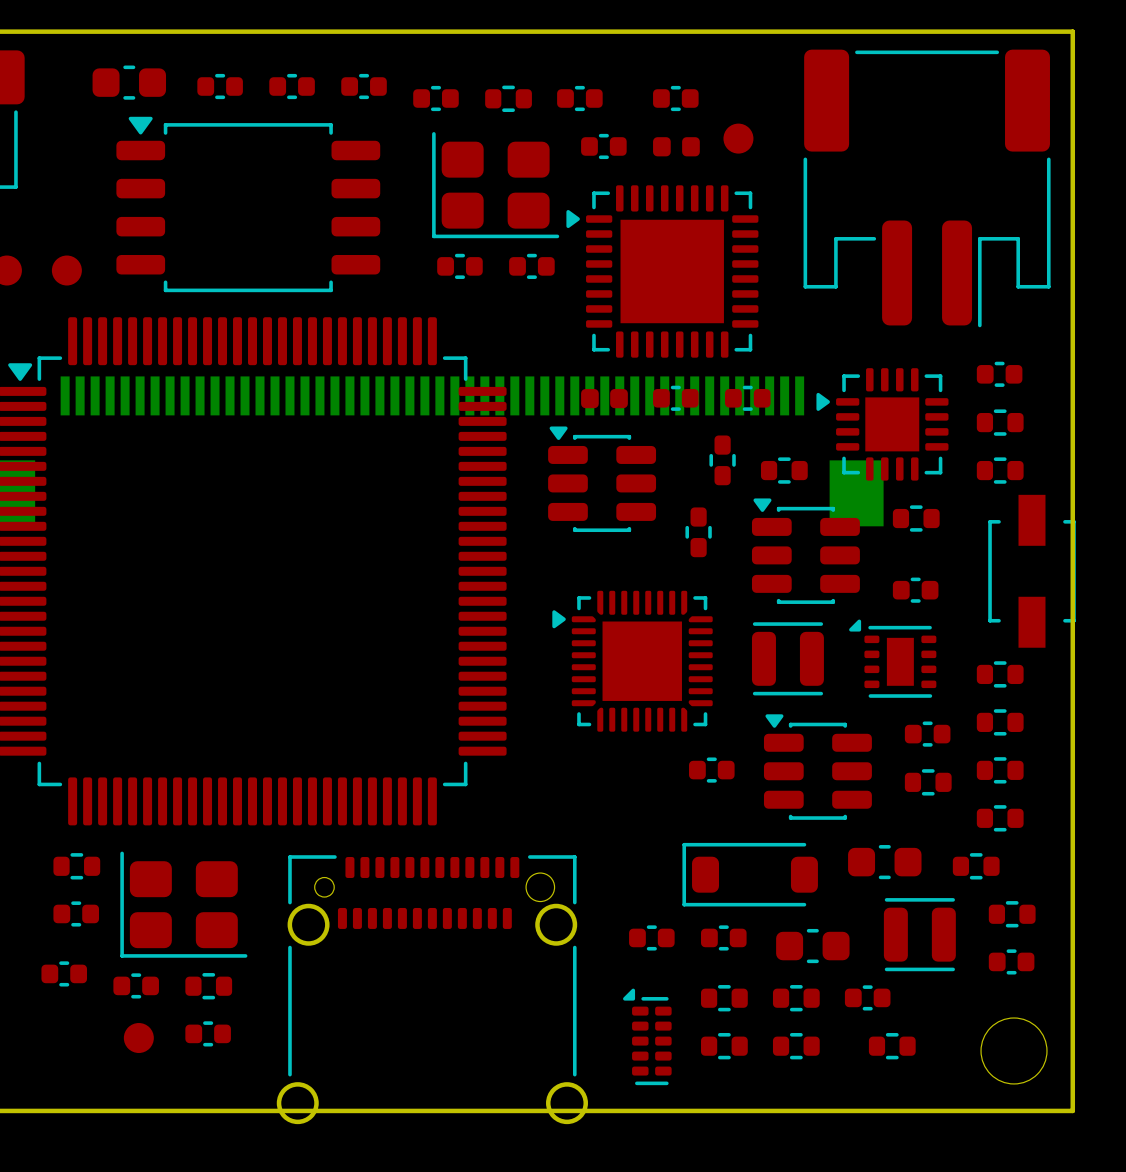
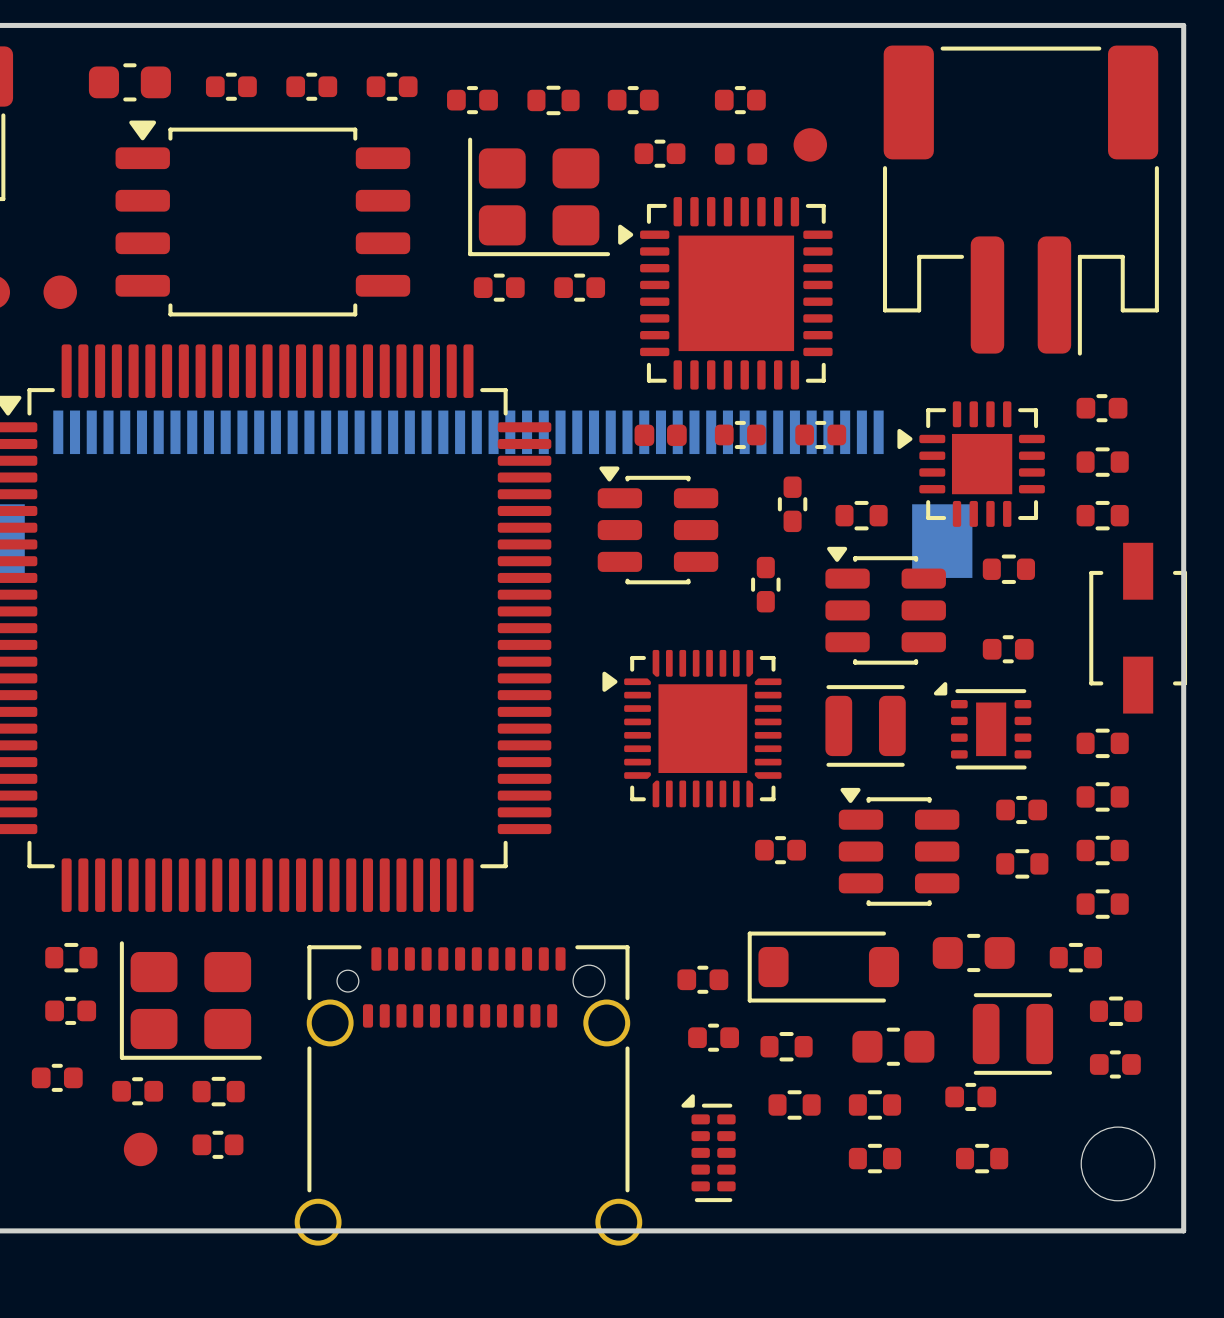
part: none -> (702, 979)
part footprint: [701, 925, 747, 951] -> [760, 1032, 813, 1062]
part position: (867, 997) -> (970, 1096)
part: (724, 1046) -> none

